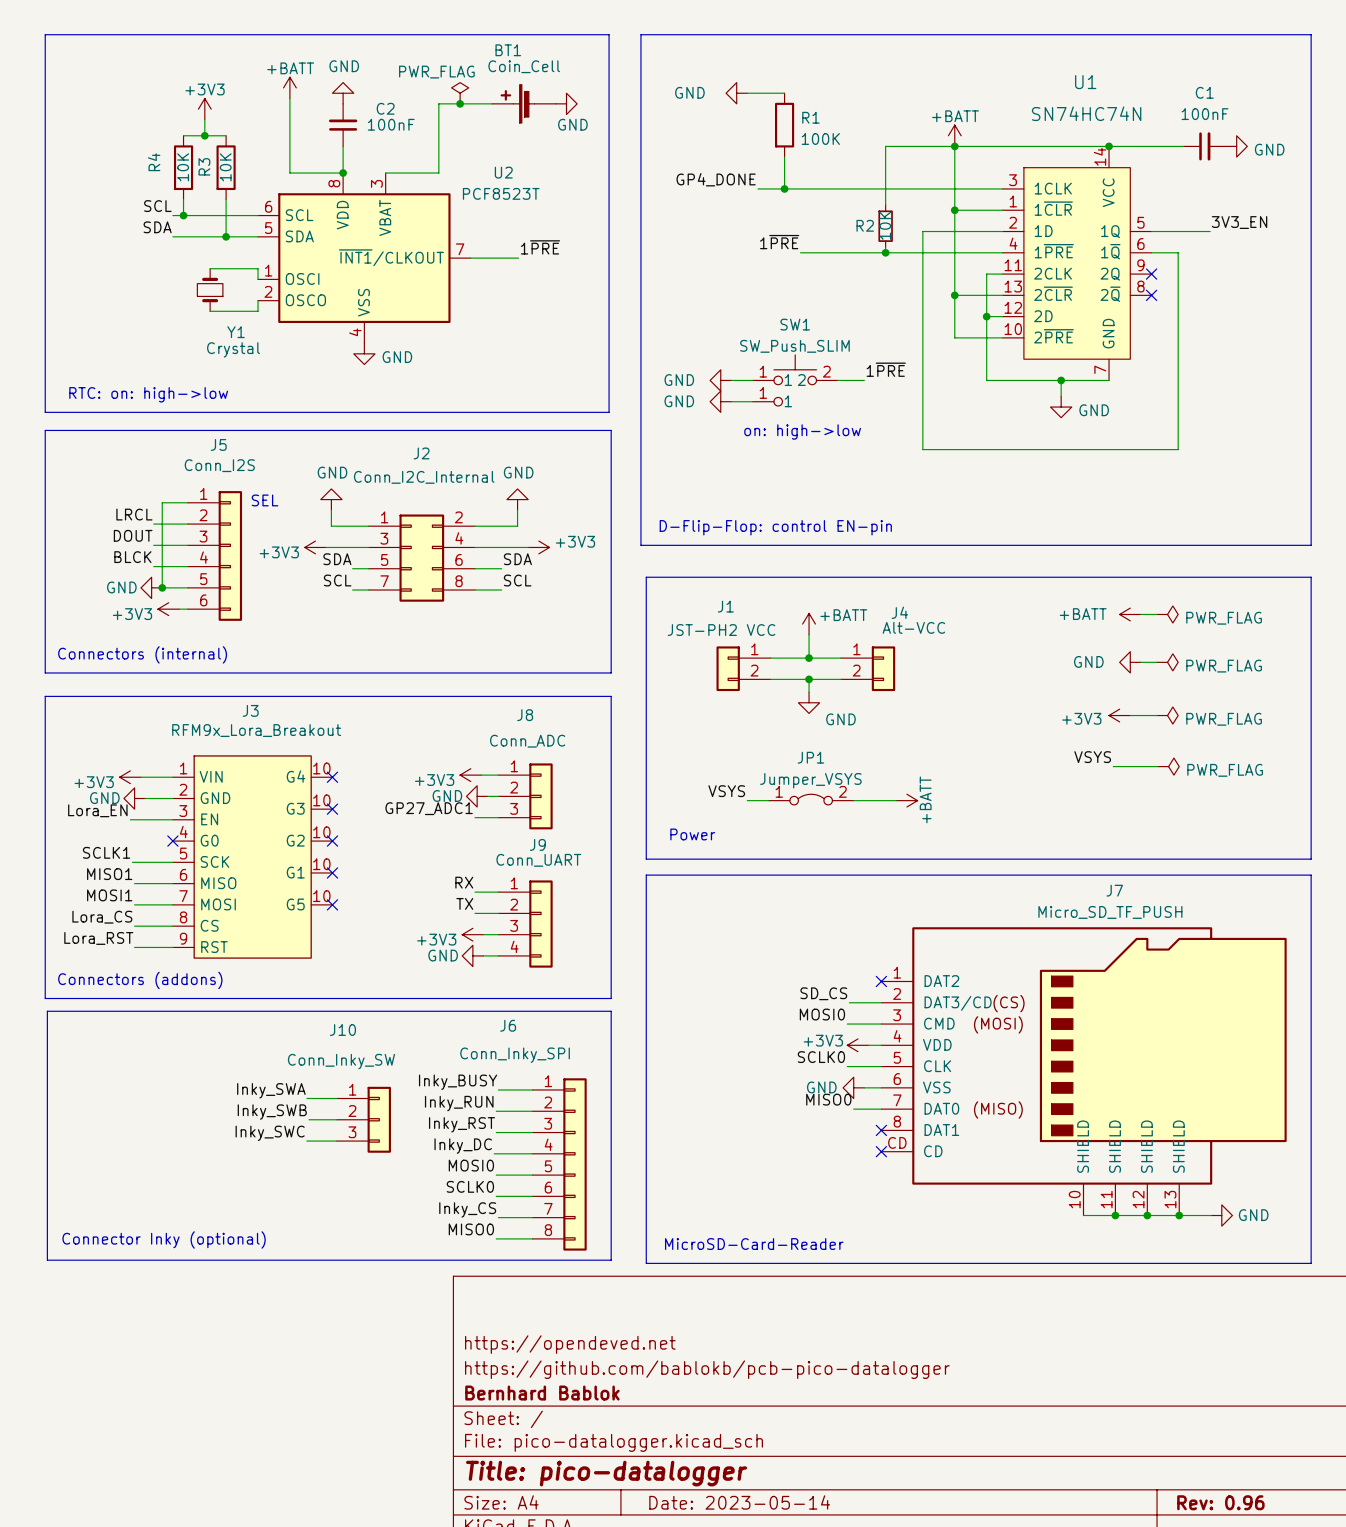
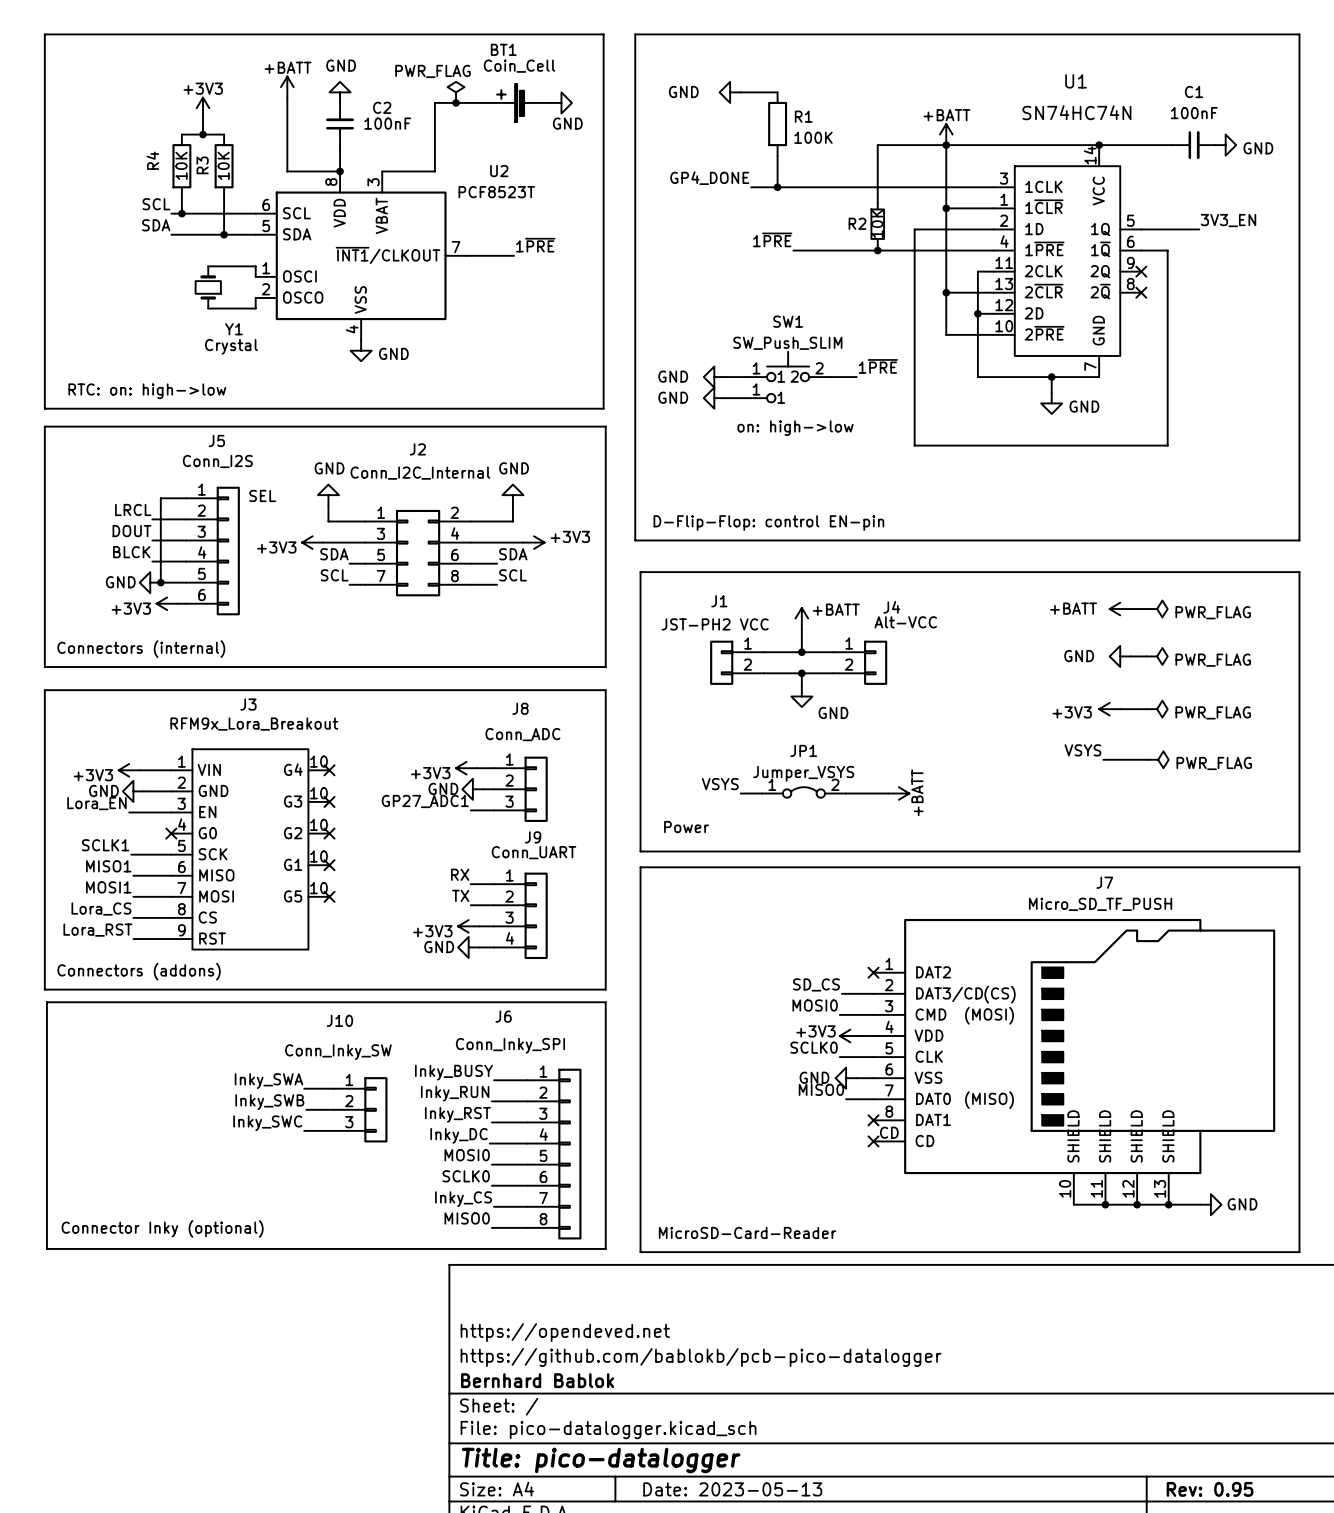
title block: Date: 2023-05-14 (739, 1502) -> Date: 2023-05-13 (732, 1489)
title block: Rev: 0.96 (1220, 1502) -> Rev: 0.95 (1210, 1489)

